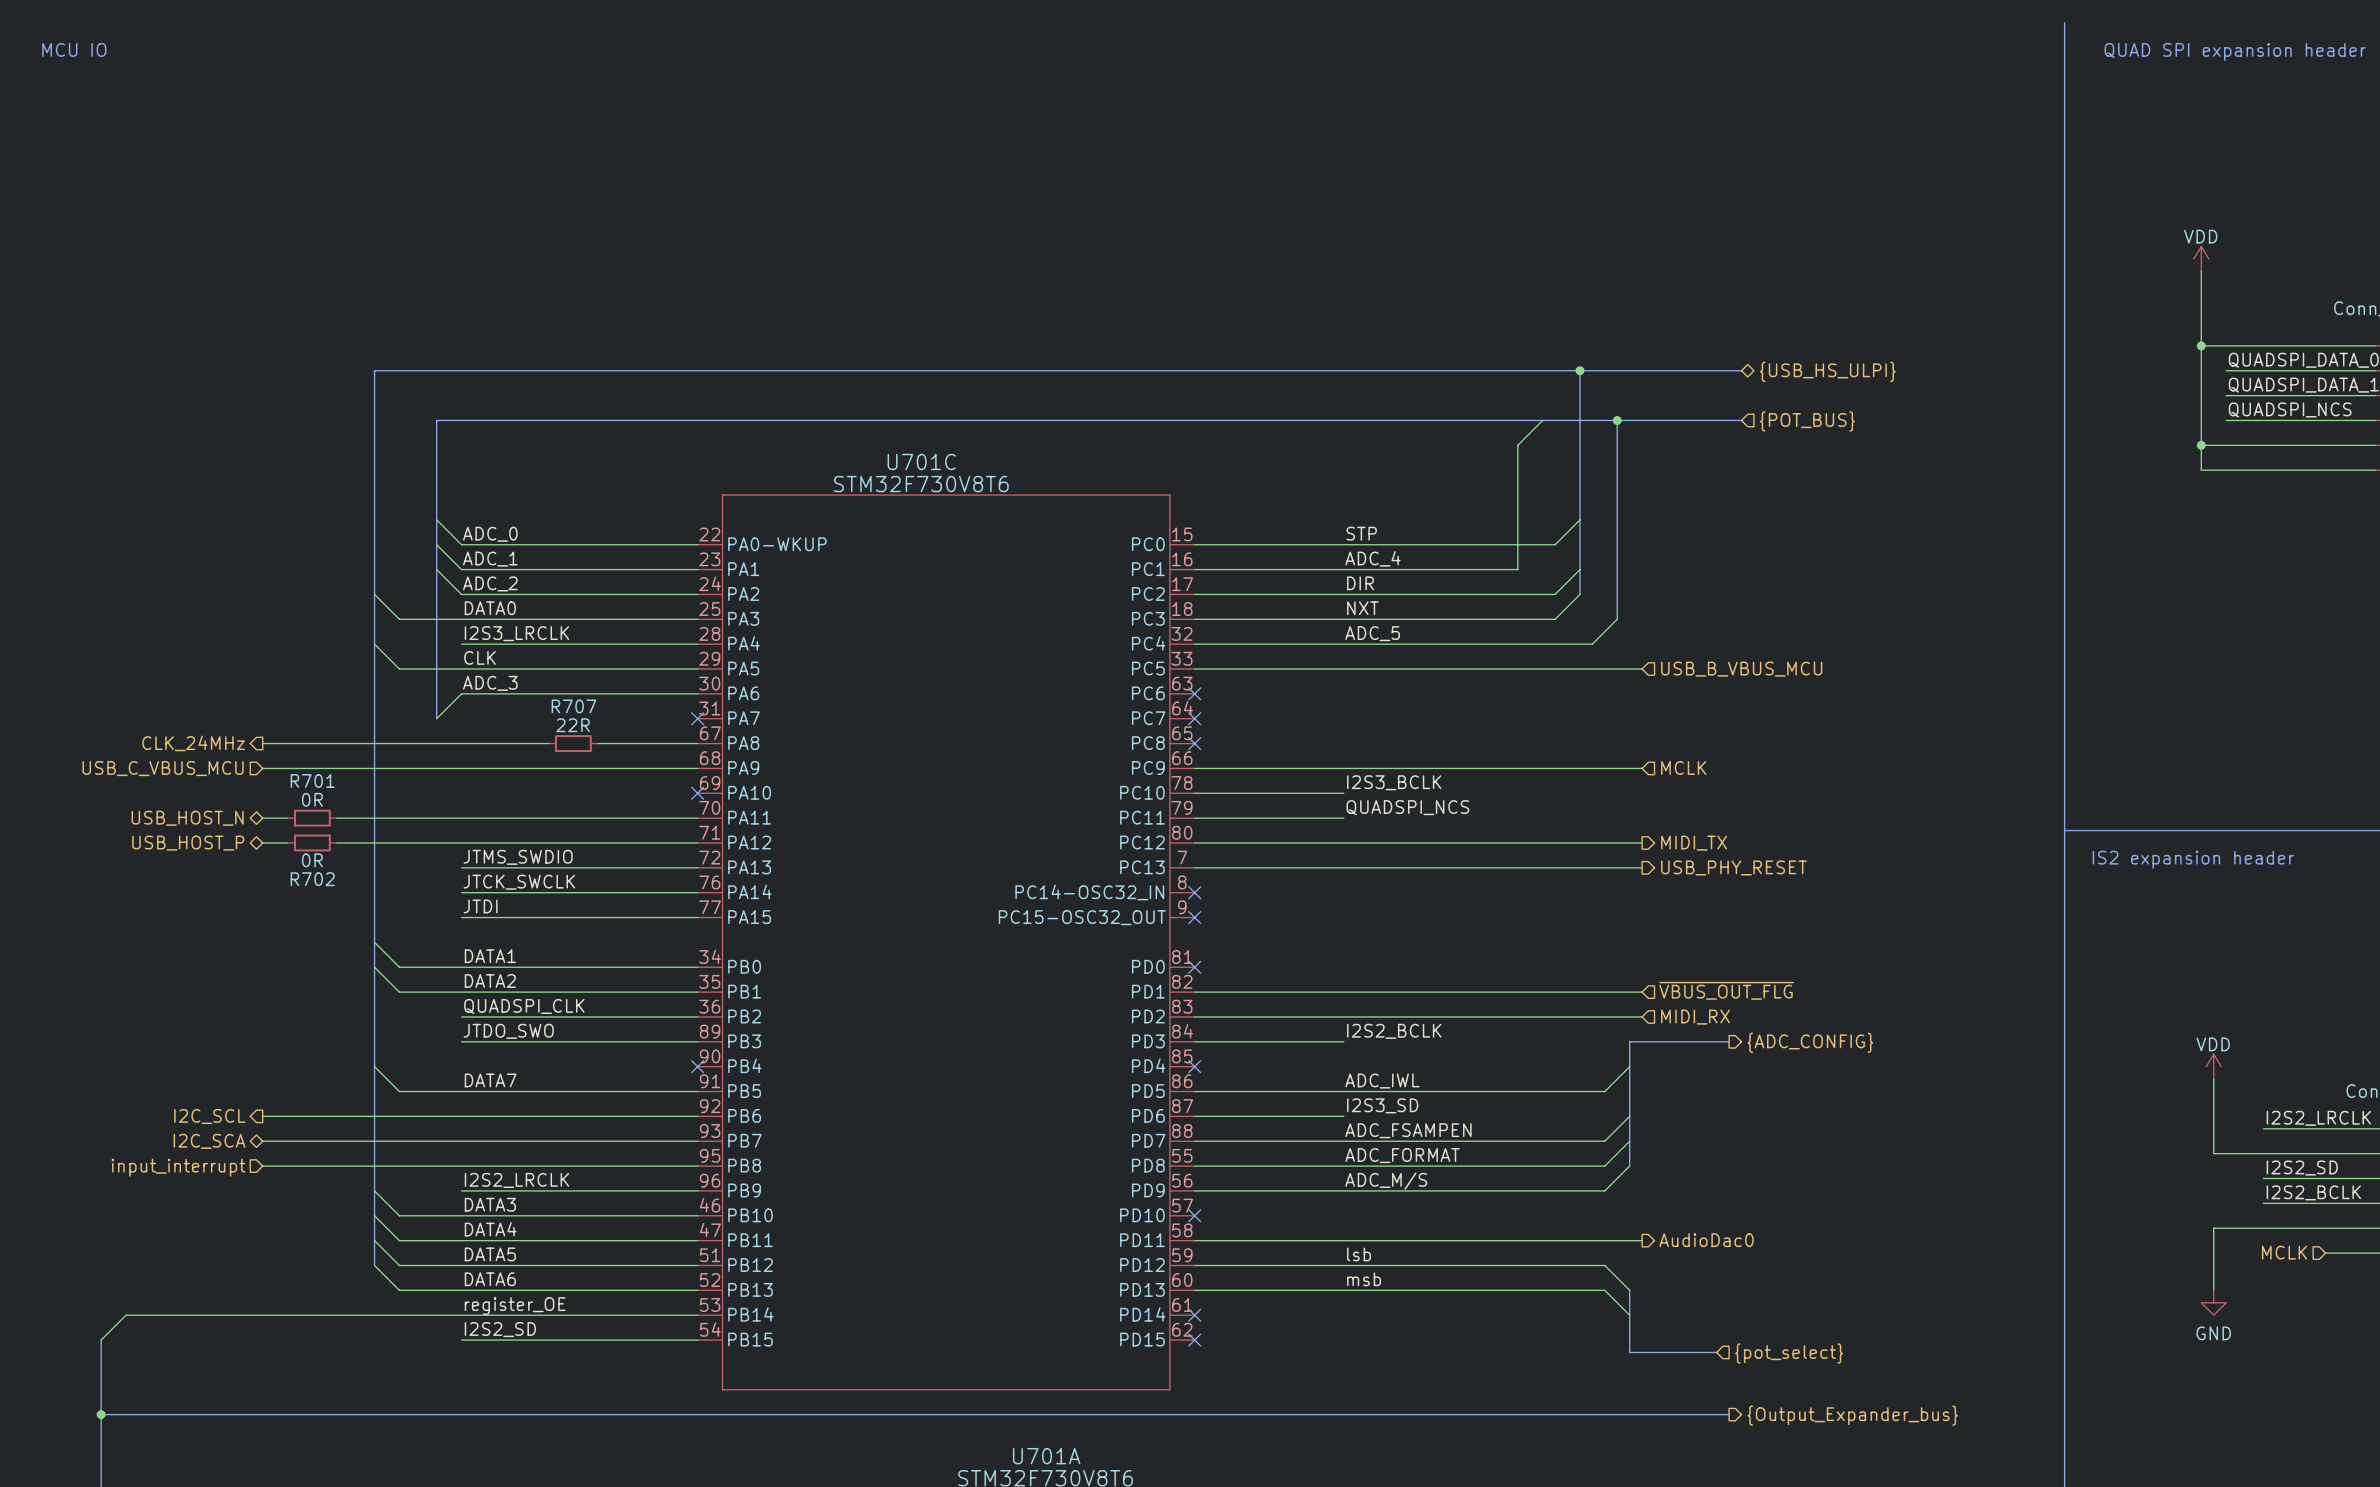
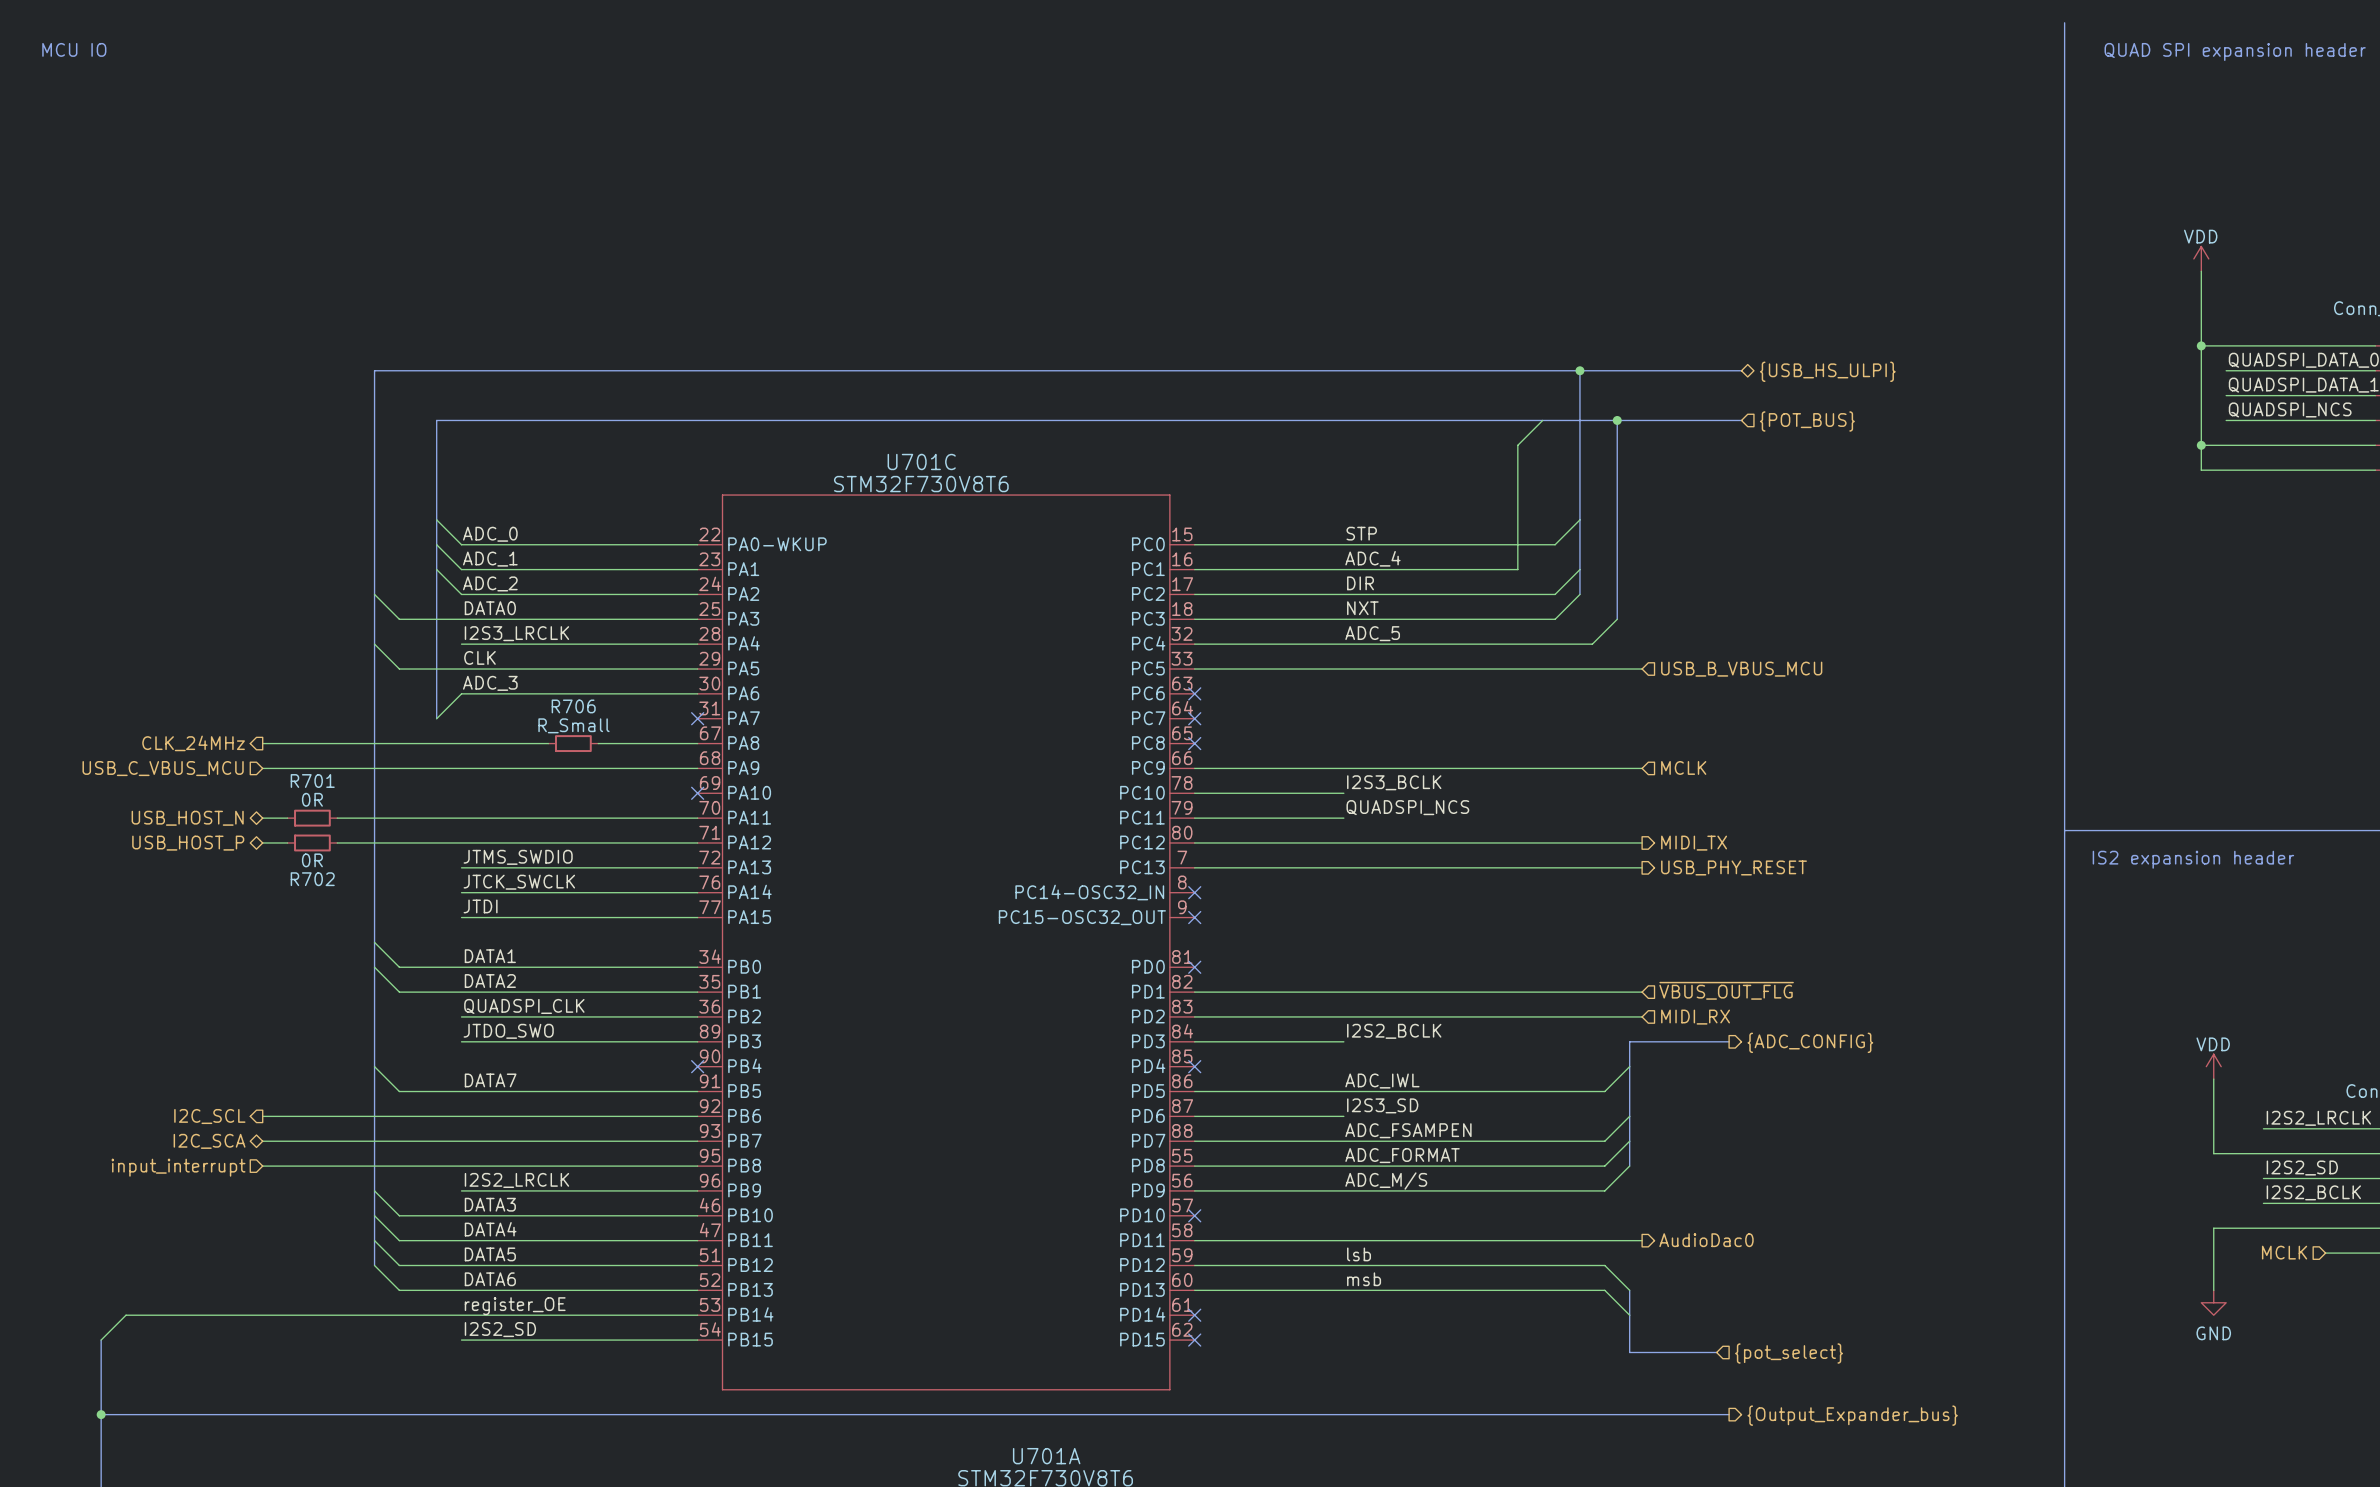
R707 name: R707 (573, 706) -> R706 (573, 706)
R707 value: 22R (573, 725) -> R_Small (573, 725)

